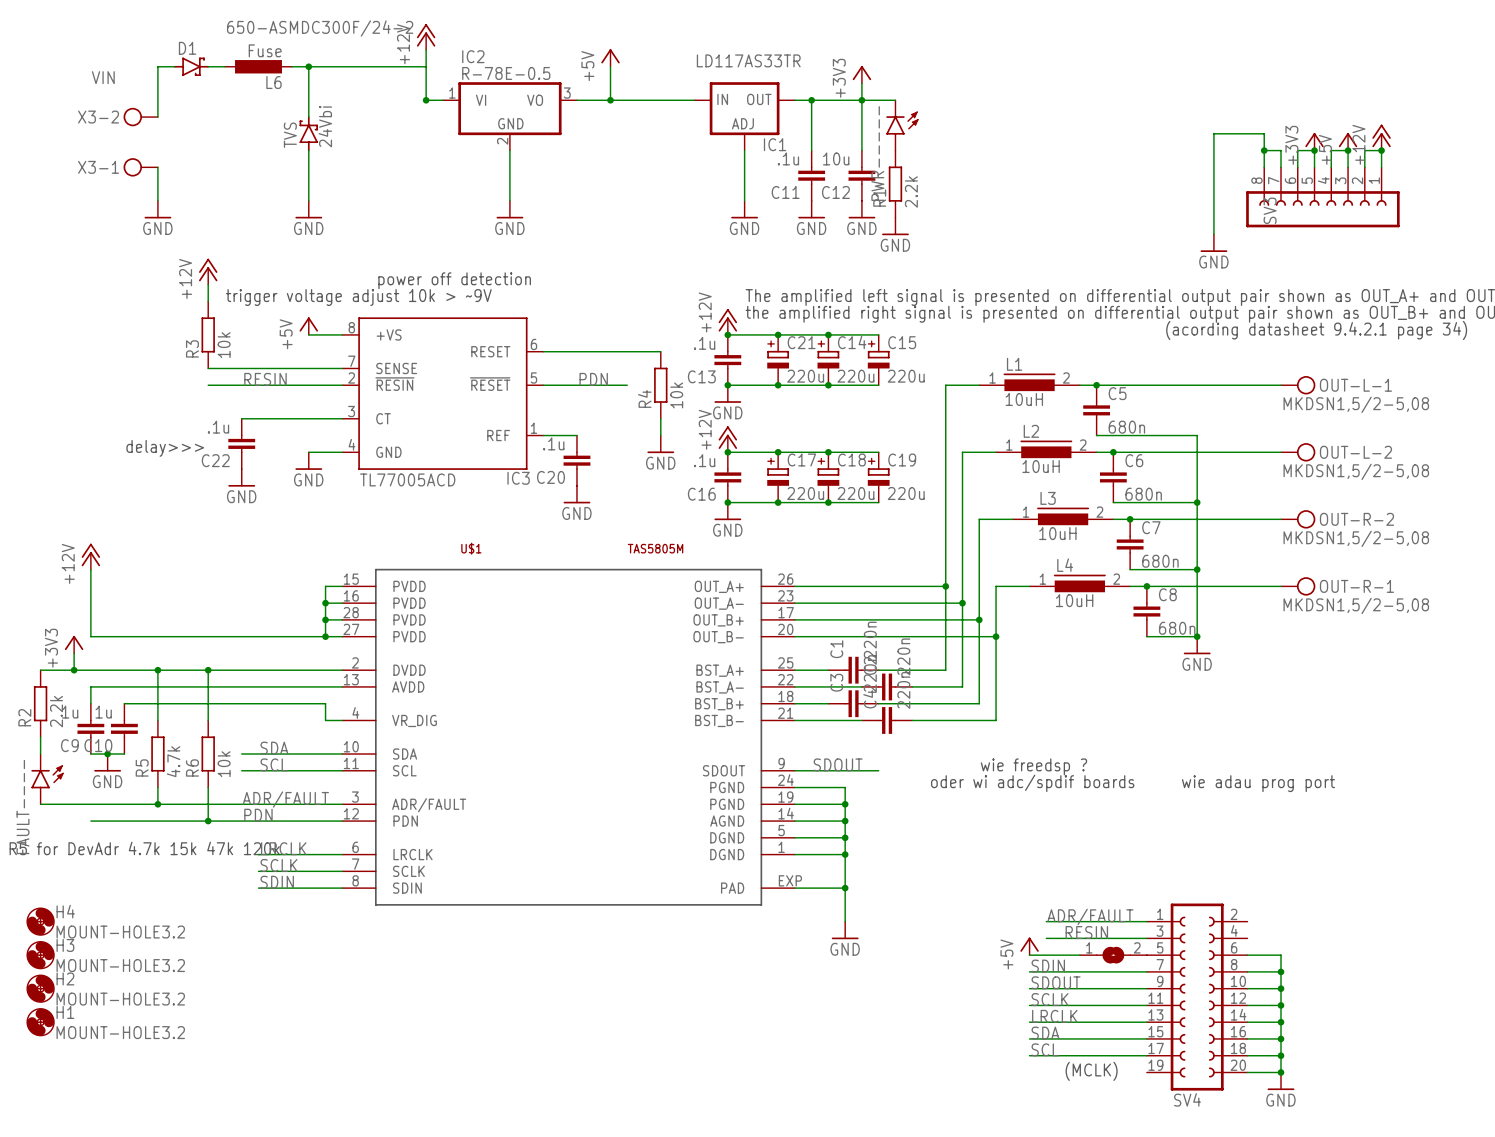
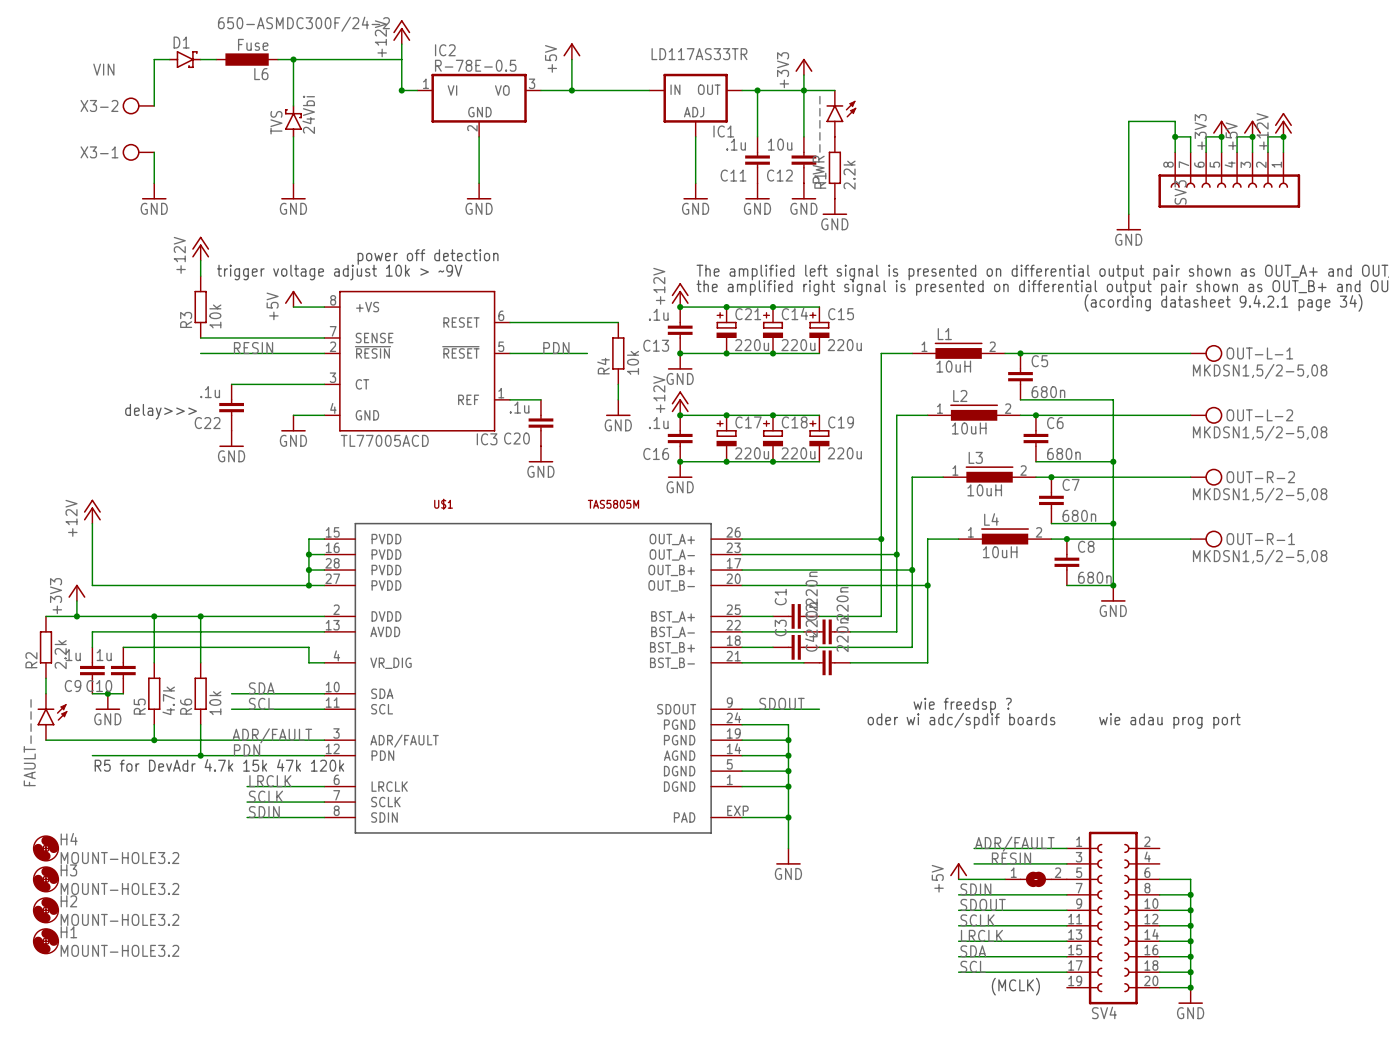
text position: R5 for DevAdr 4.7k 15k 47k 120k (144, 848) -> R5 for DevAdr 4.7k 15k 47k 120k (219, 765)

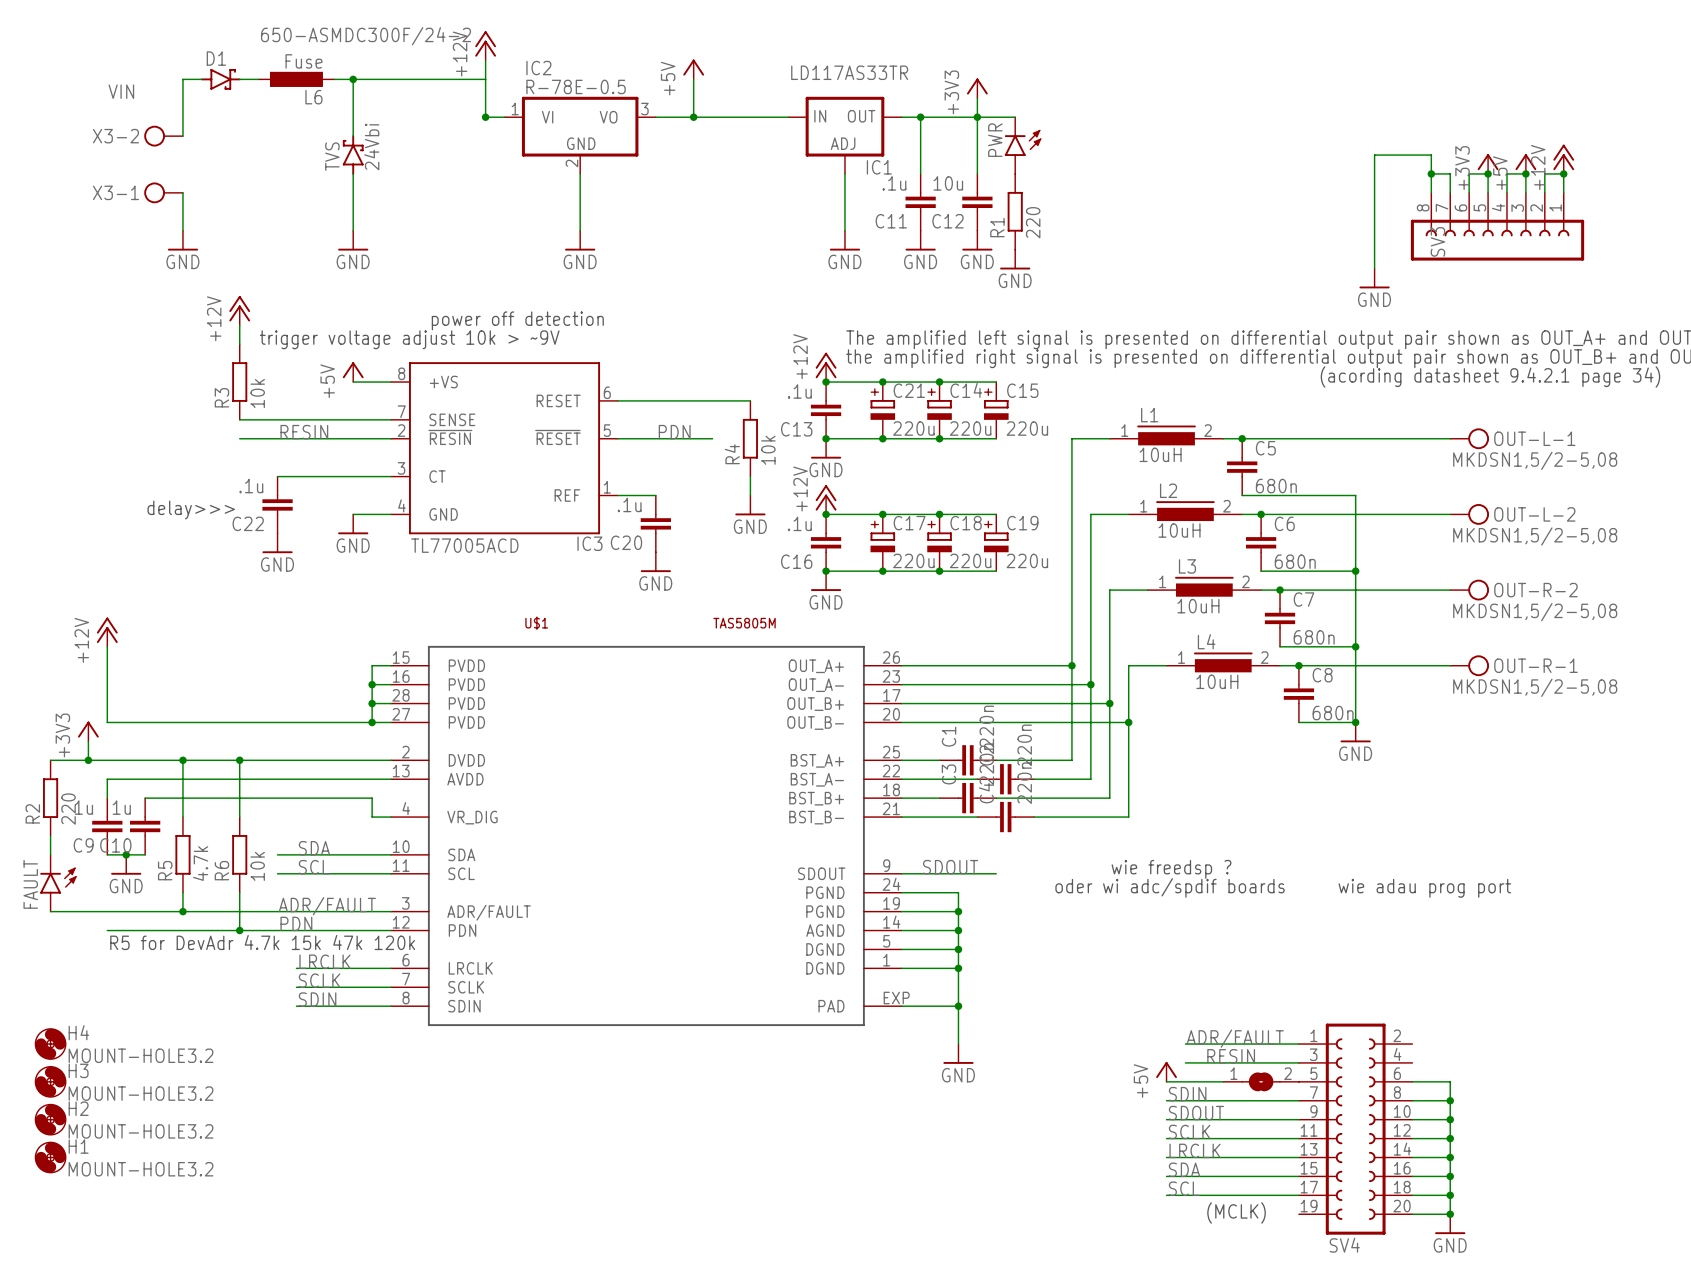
PWR----- name: PWR----- (818, 139) -> PWR (995, 140)
R1 value: 2.2k (849, 175) -> 220 (1033, 222)
R2 value: 2.2k (60, 654) -> 220 (68, 809)
FAULT---- name: FAULT---- (29, 742) -> FAULT (30, 884)

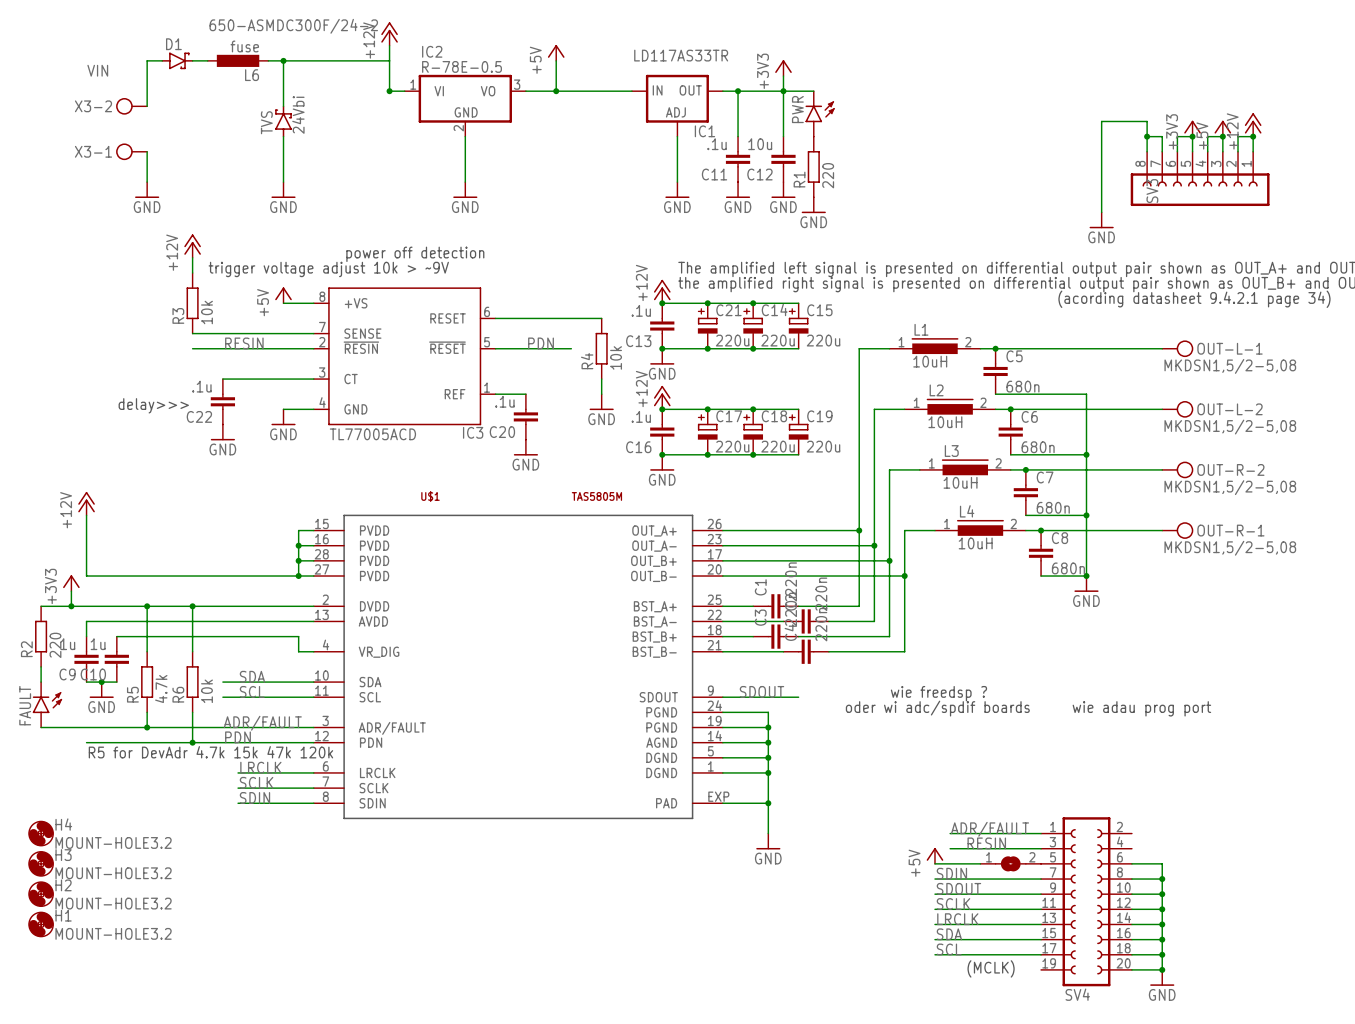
L6 value: Fuse (303, 61) -> fuse (244, 46)

